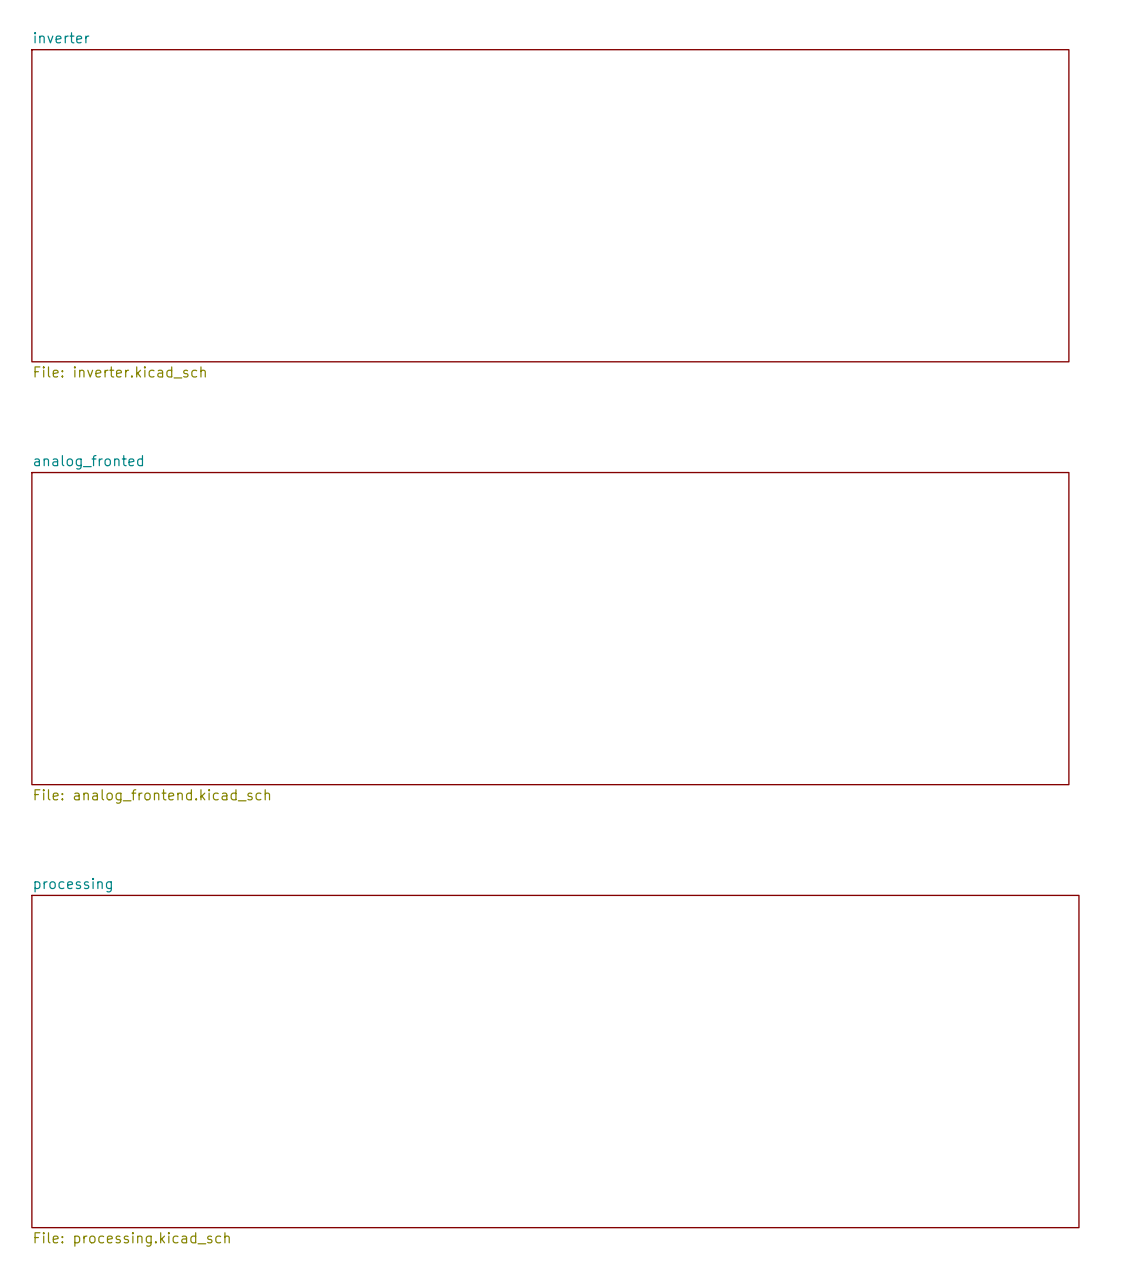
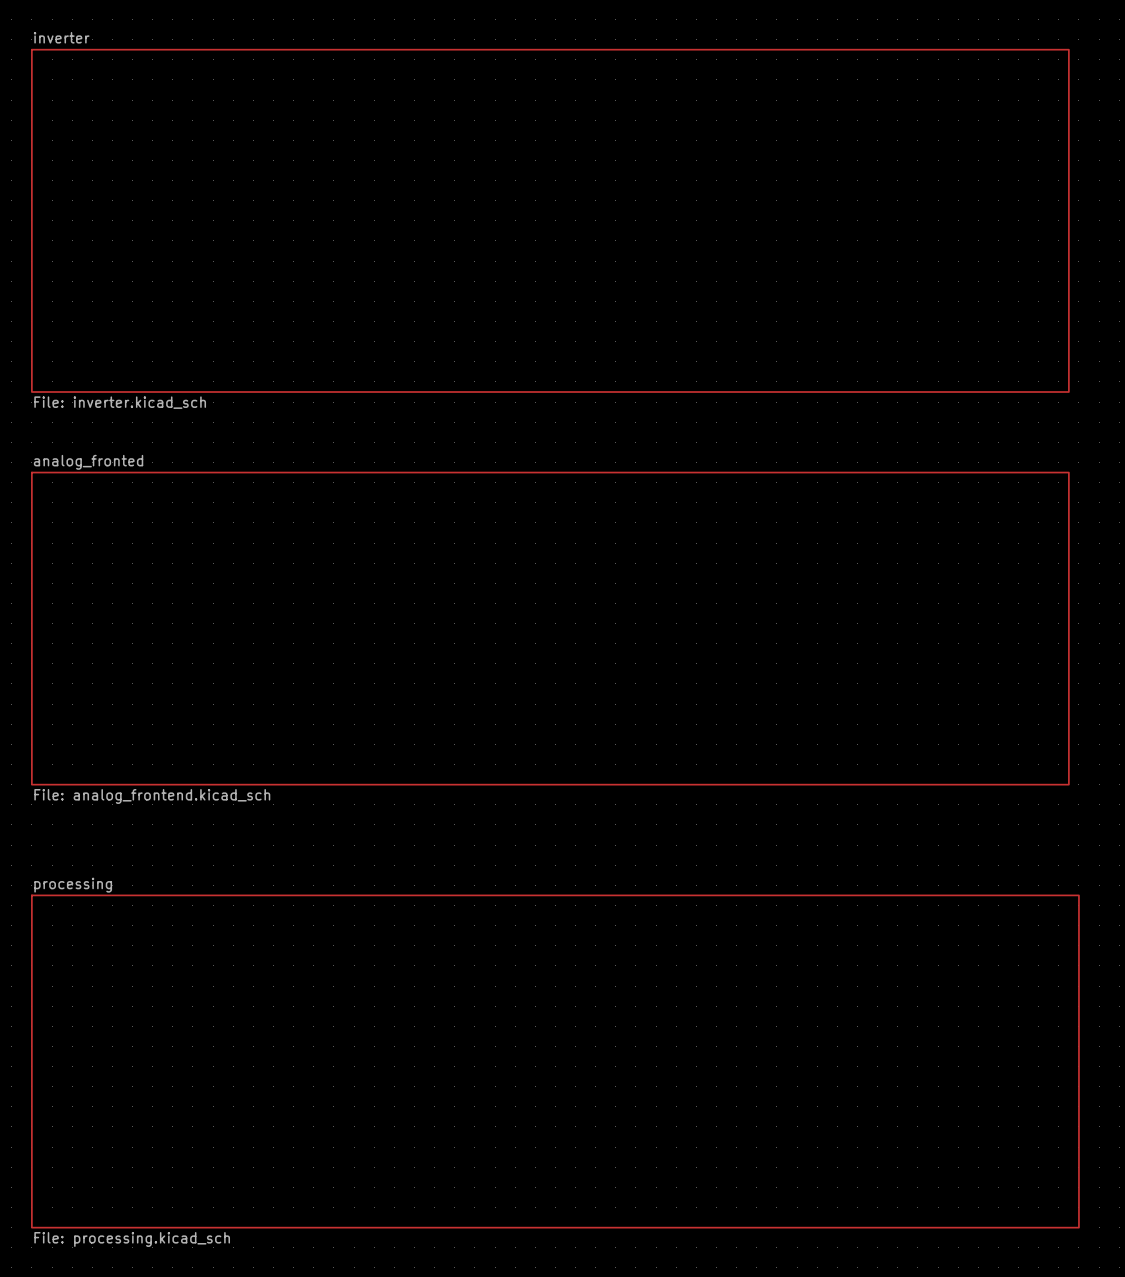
sheet inverter: File: inverter.kicad_sch (550, 205) -> none
sheet inverter: none -> File: inverter.kicad_sch (550, 220)

